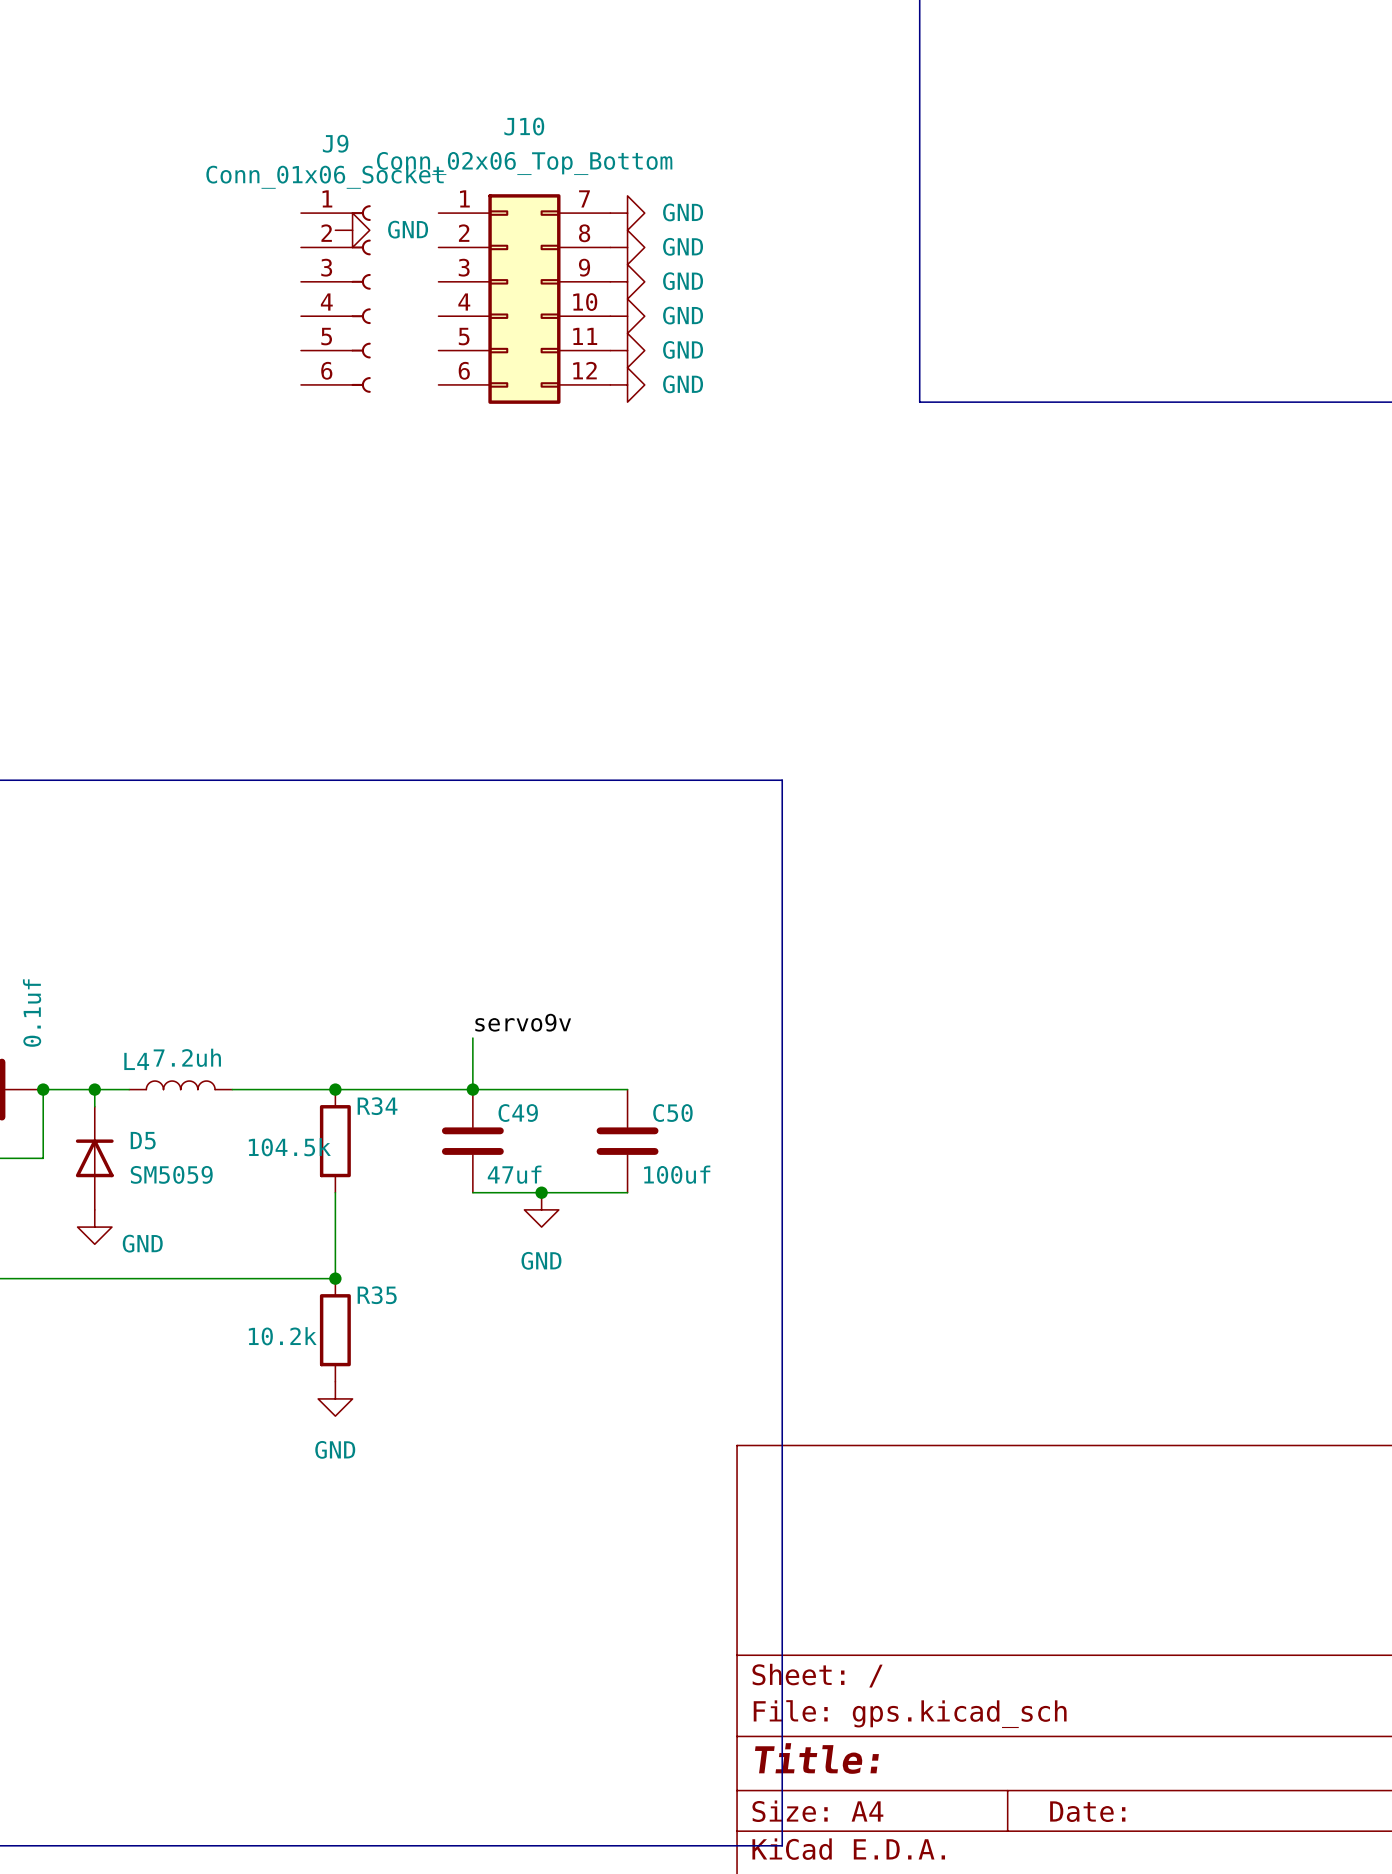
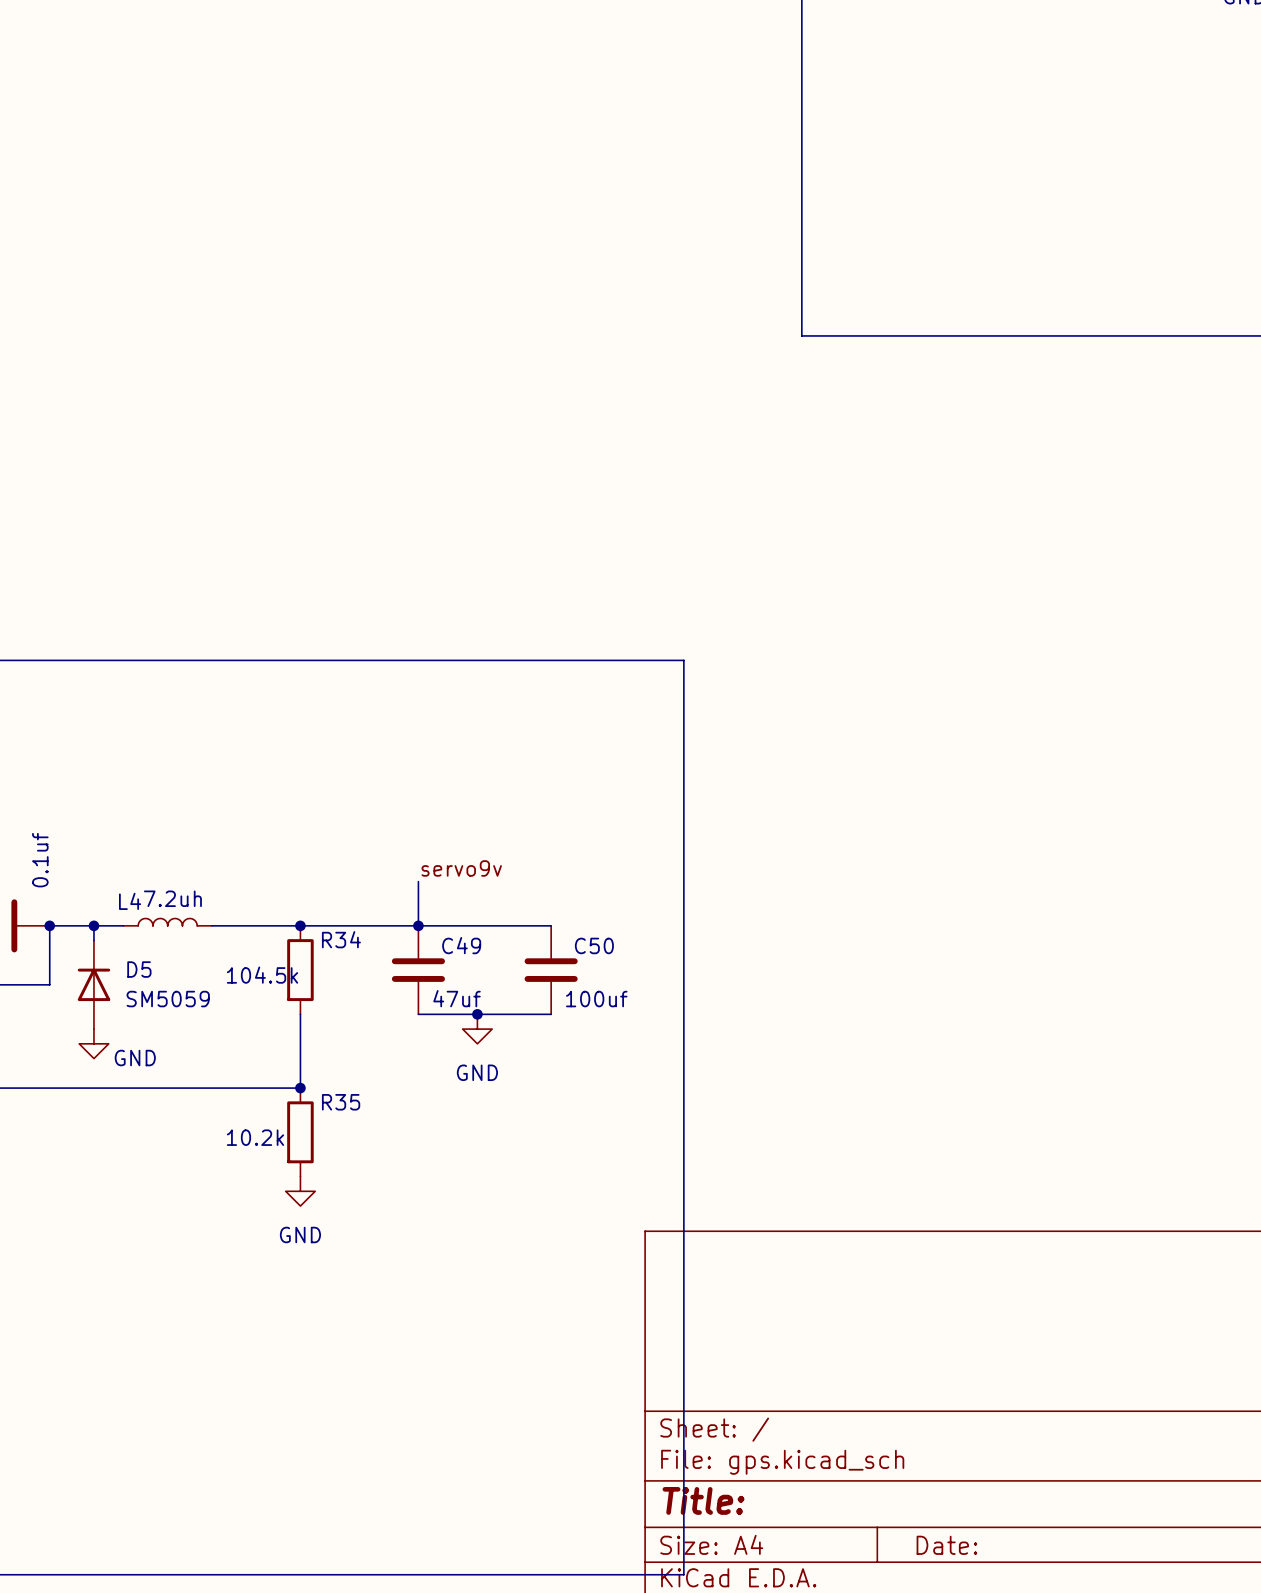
power symbol: GND (627, 213) -> none
power symbol: GND (352, 230) -> none
power symbol: GND (627, 247) -> none
power symbol: GND (627, 281) -> none
J9: Conn_01x06_Socket (335, 299) -> none
J10: Conn_02x06_Top_Bottom (524, 299) -> none
power symbol: GND (627, 316) -> none
power symbol: GND (627, 350) -> none
power symbol: GND (627, 384) -> none

